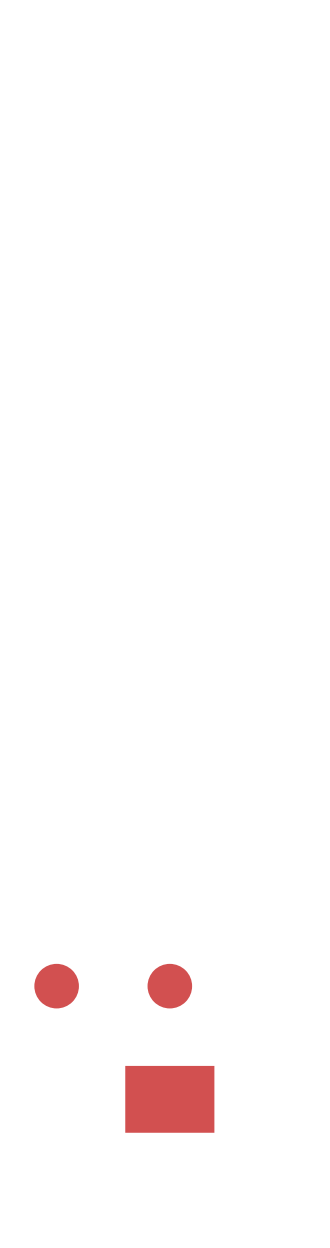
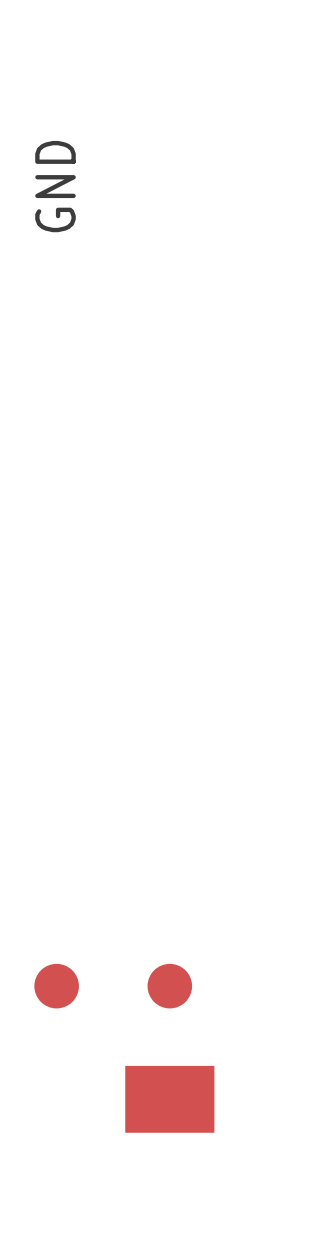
text: none -> GND (55, 186)

